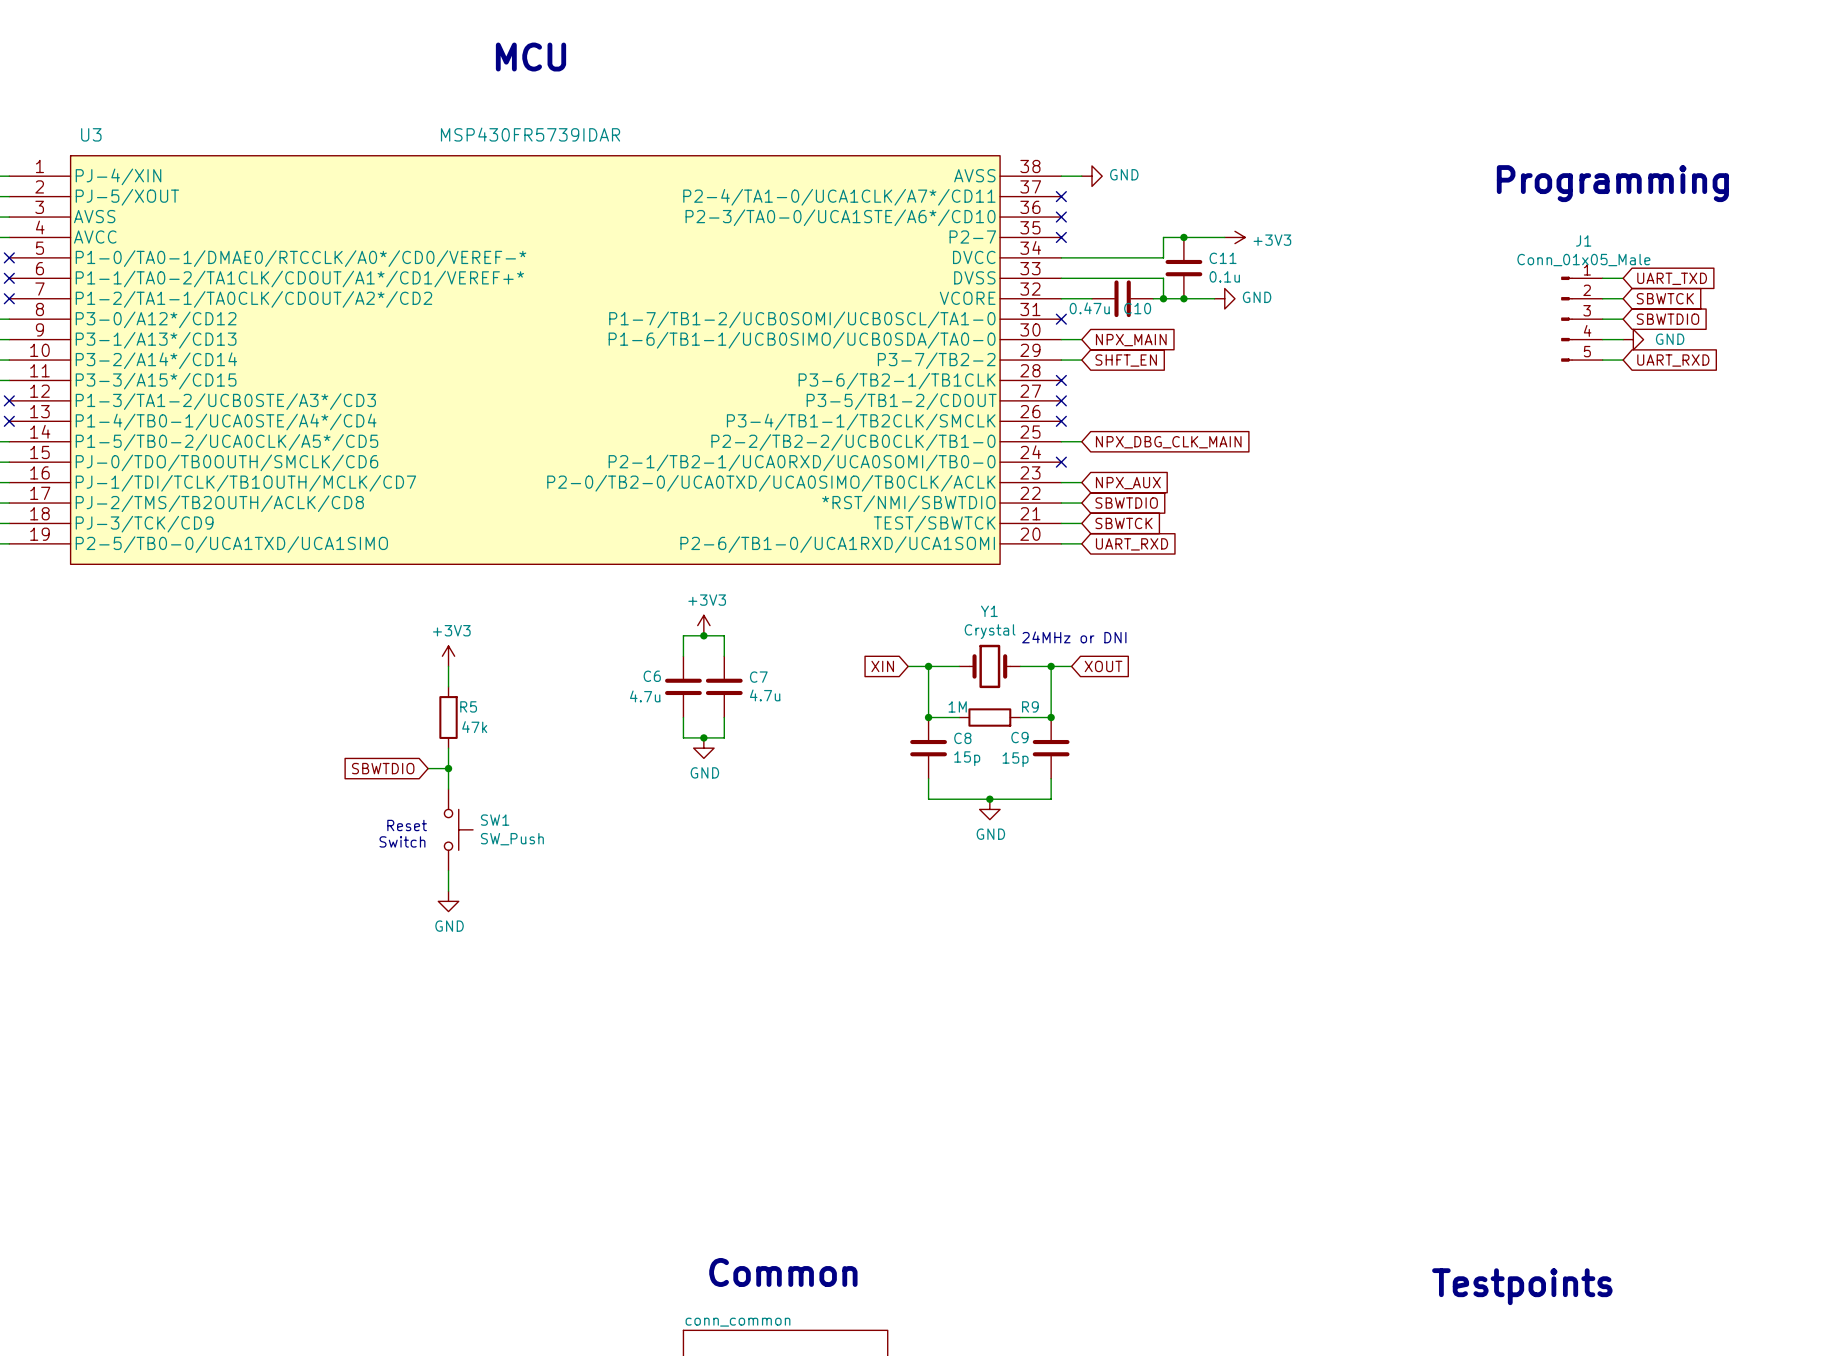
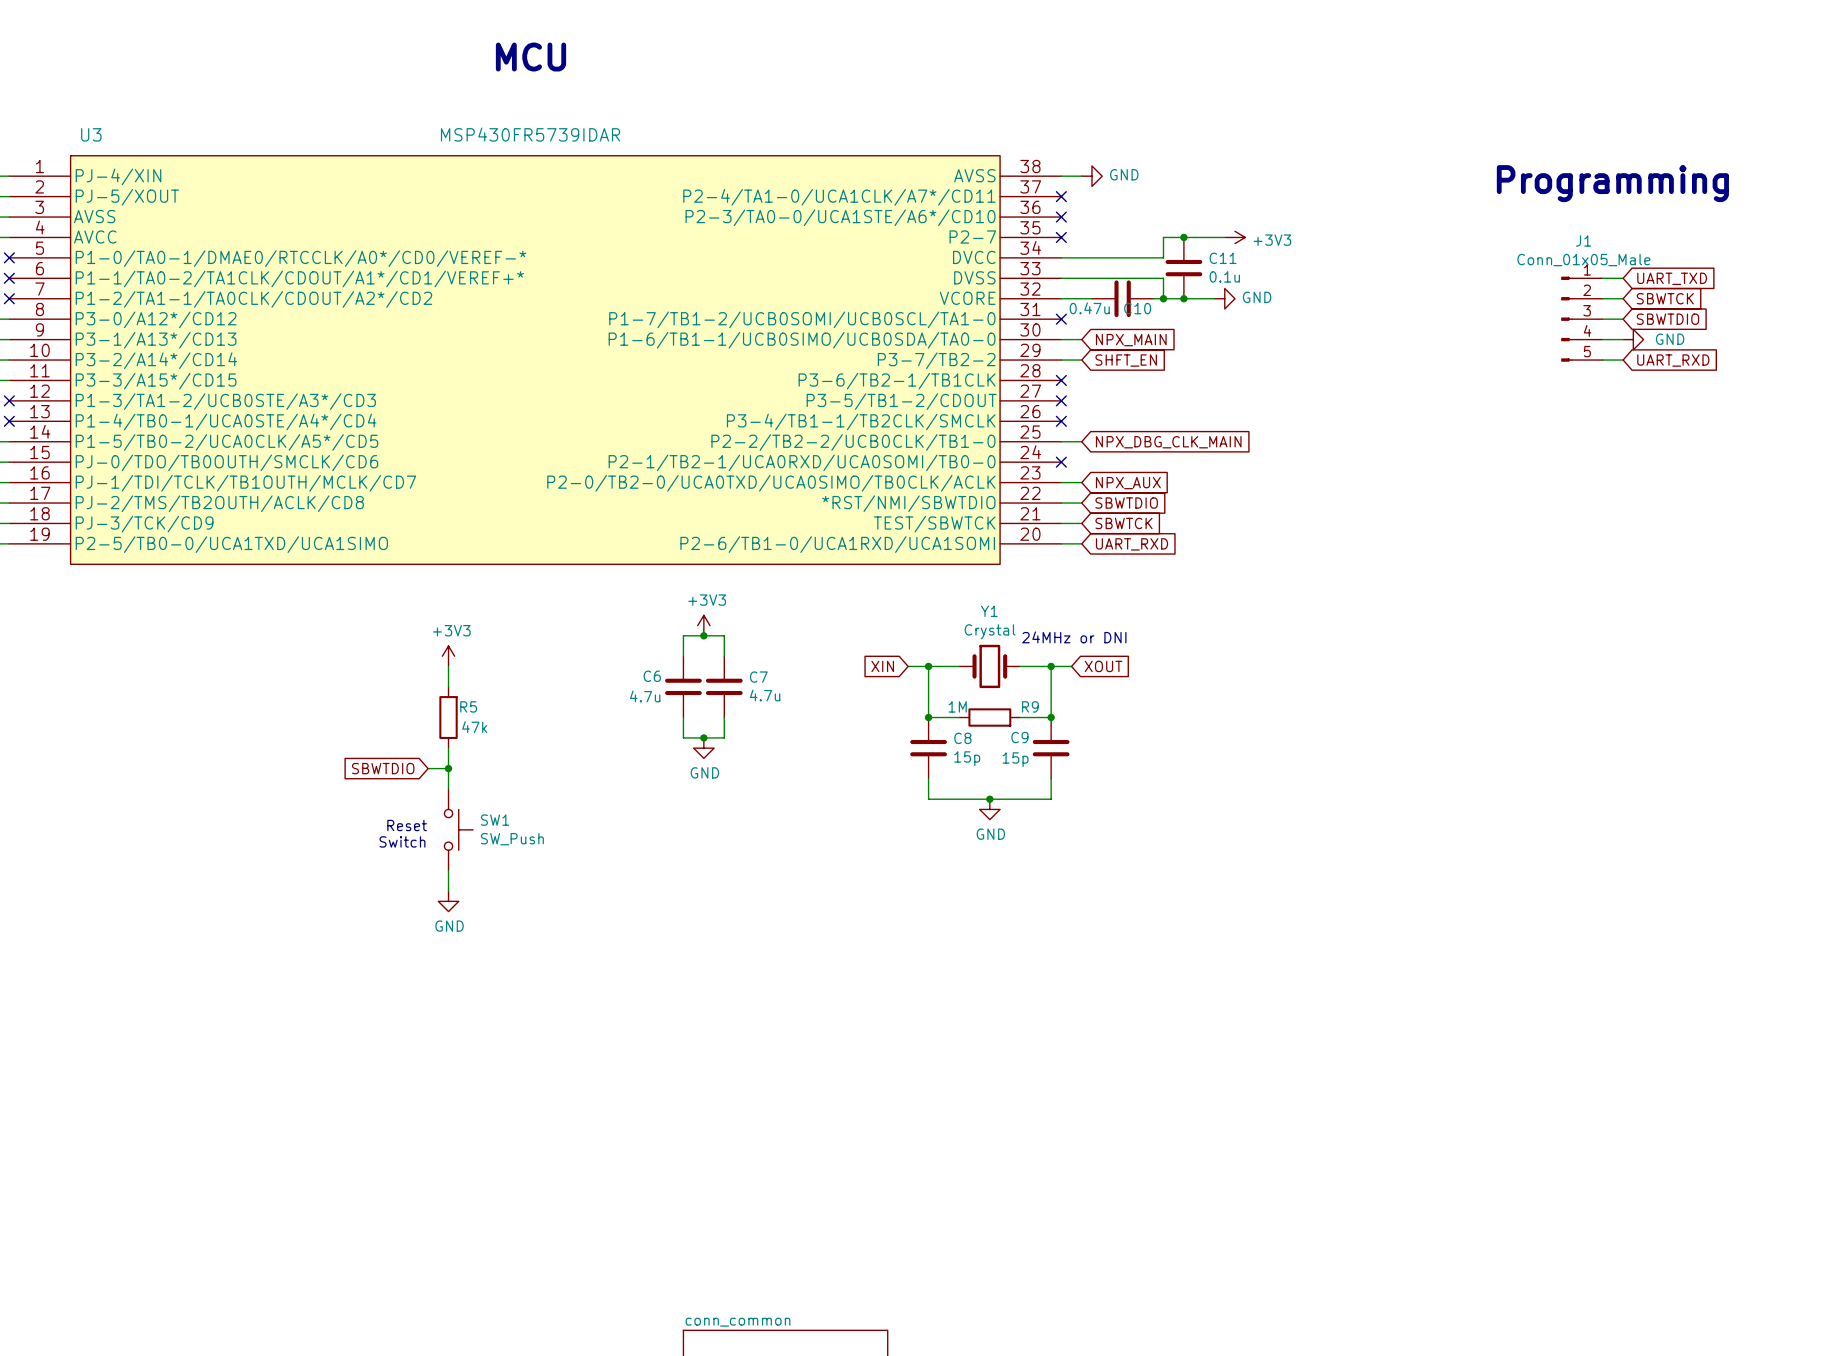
text: Common (783, 1272) -> none
text: Testpoints (1522, 1286) -> none

